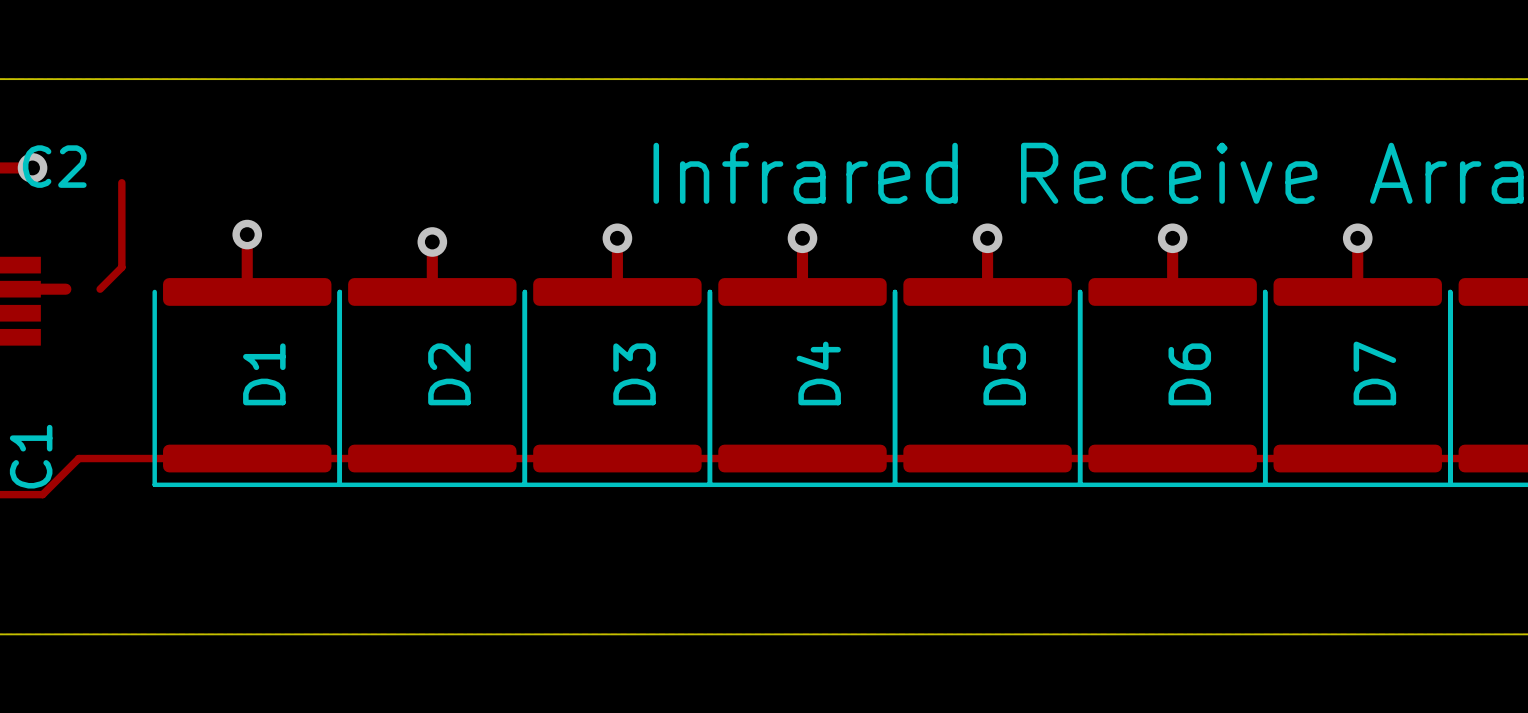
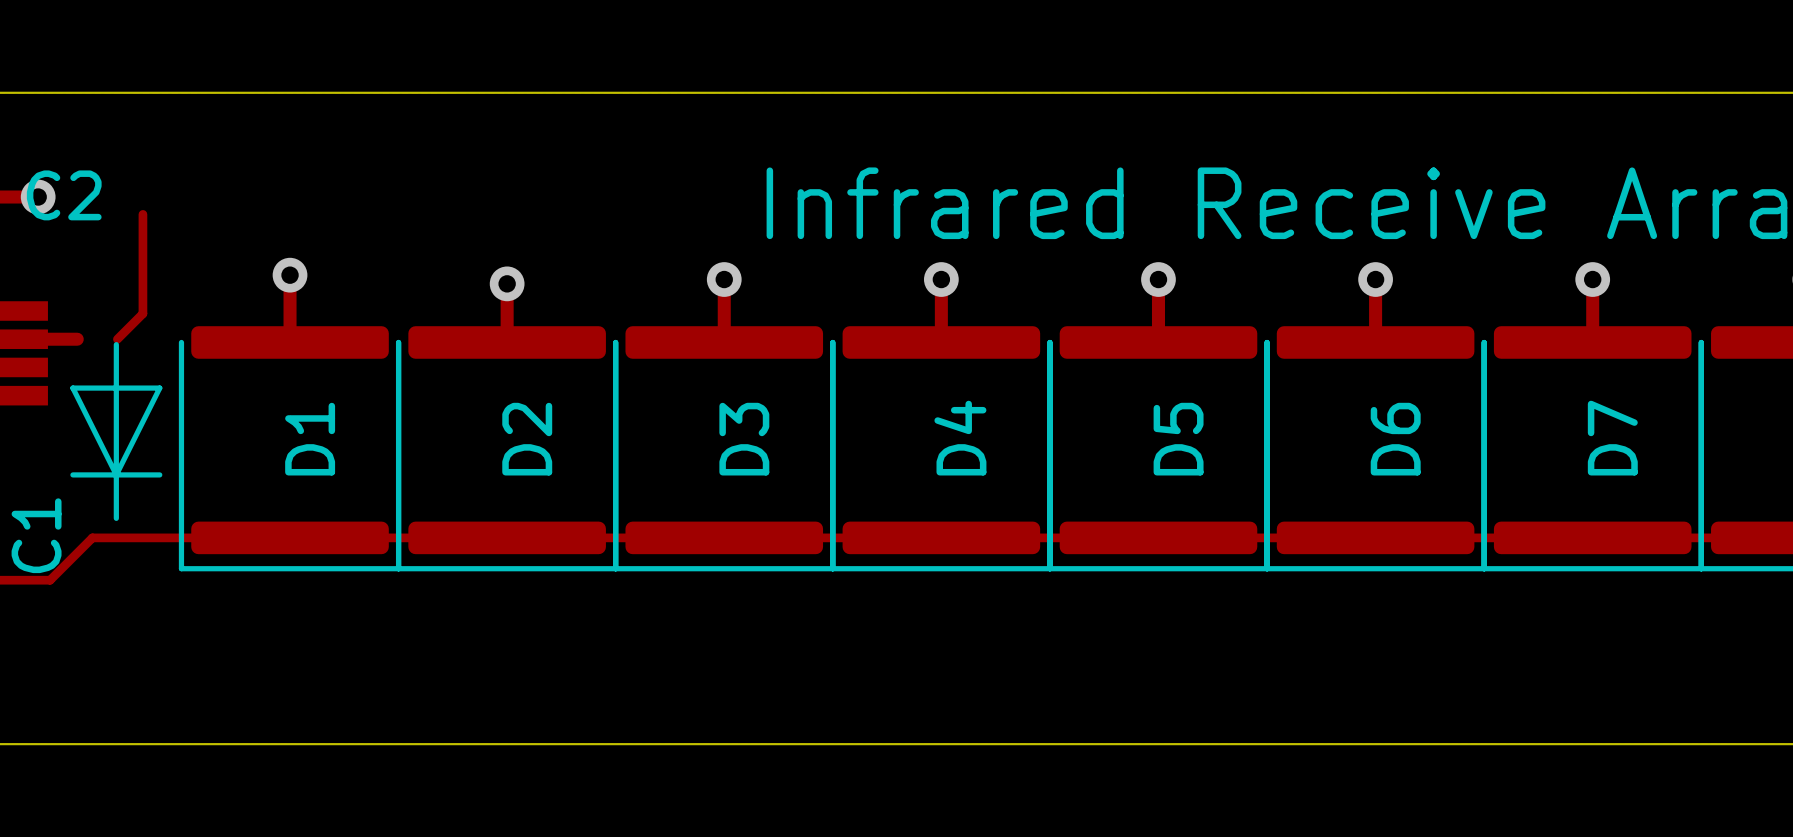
line: none -> (116, 344) (116, 518)
line: none -> (72, 388) (116, 474) (159, 388) (72, 388)
line: none -> (72, 474) (159, 474)

